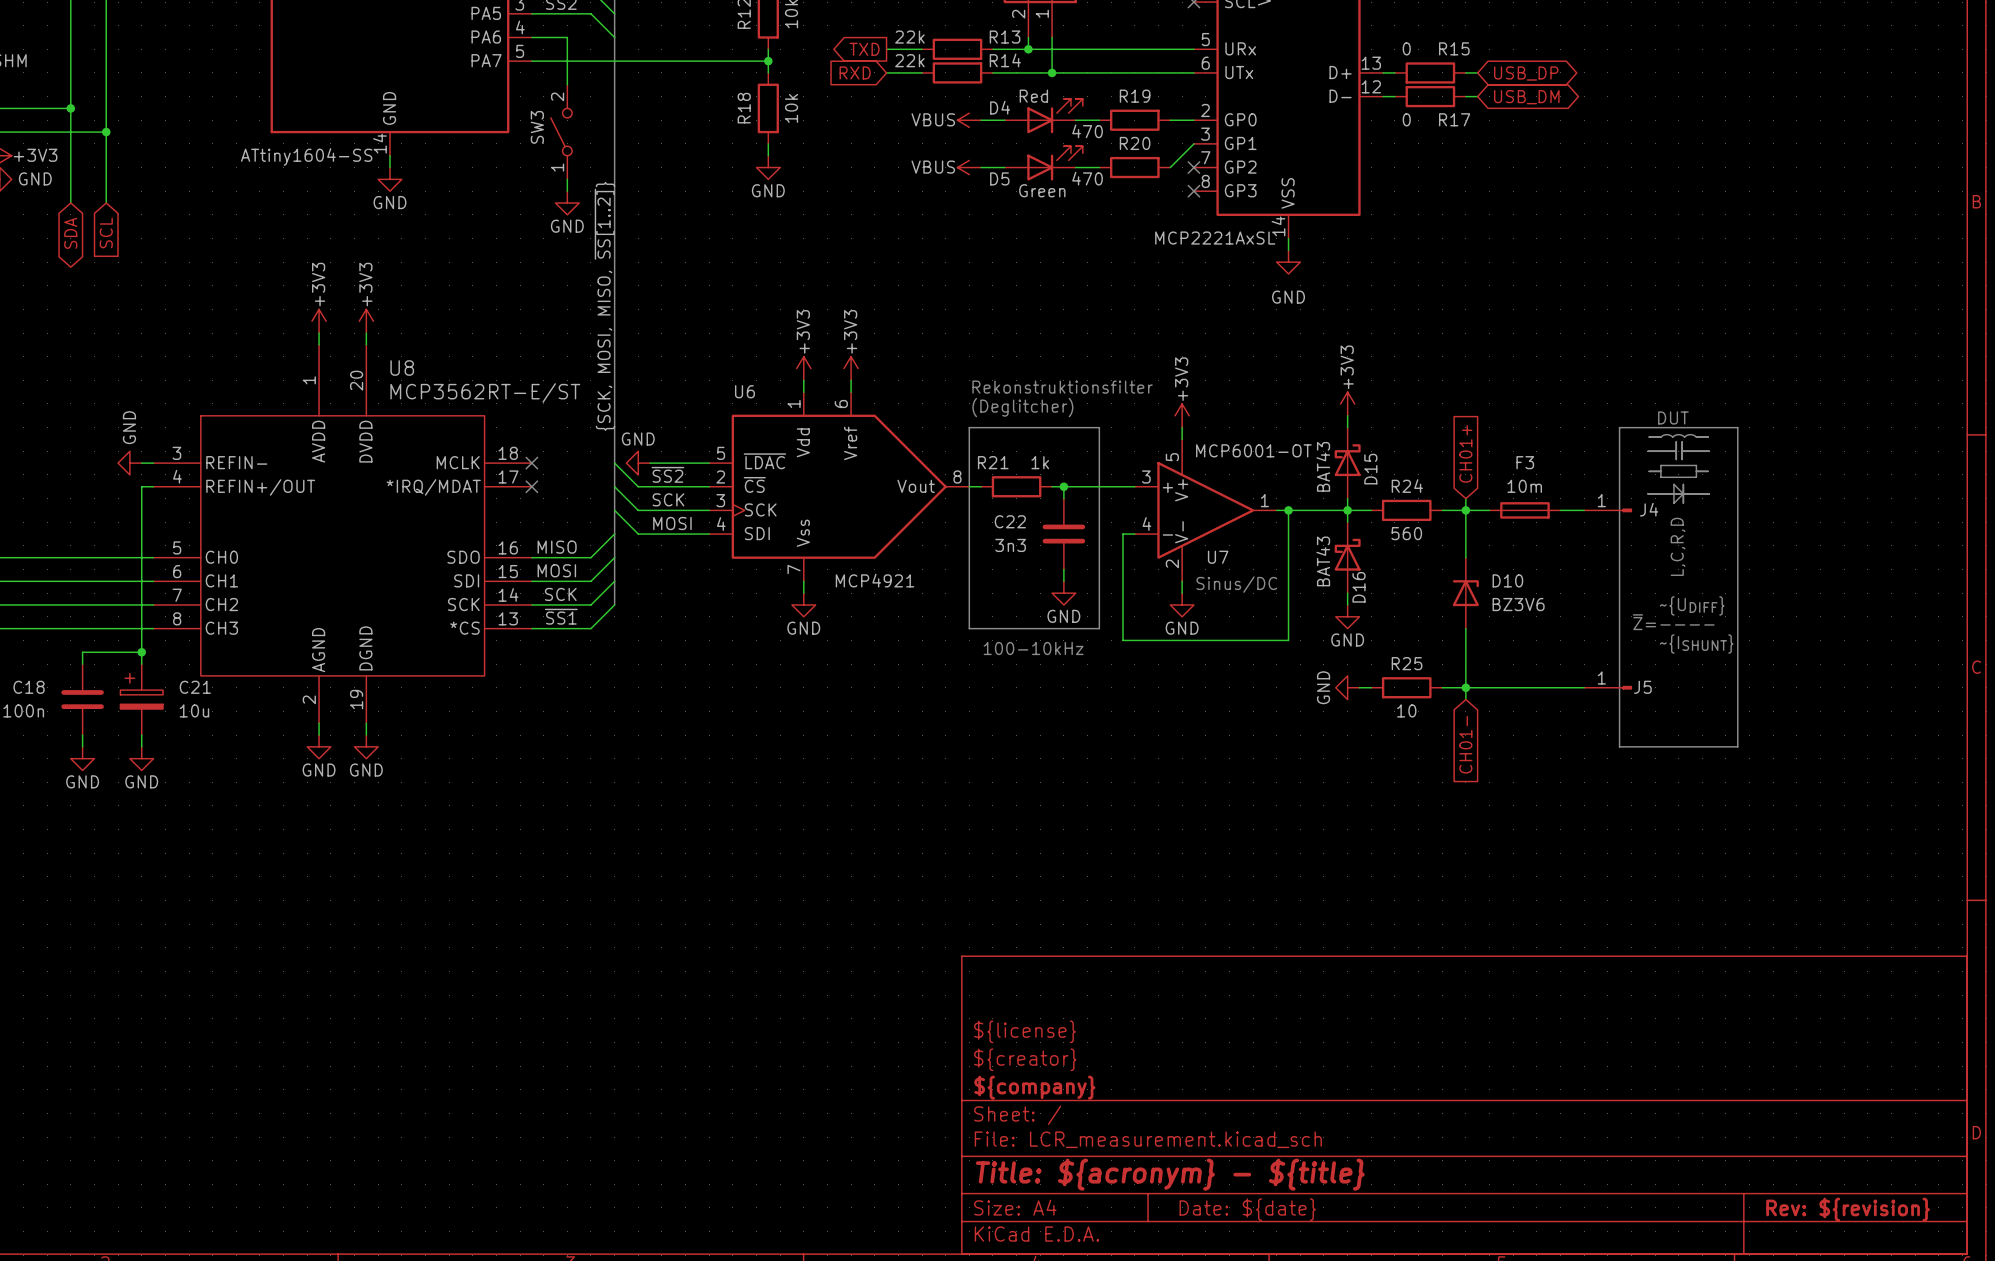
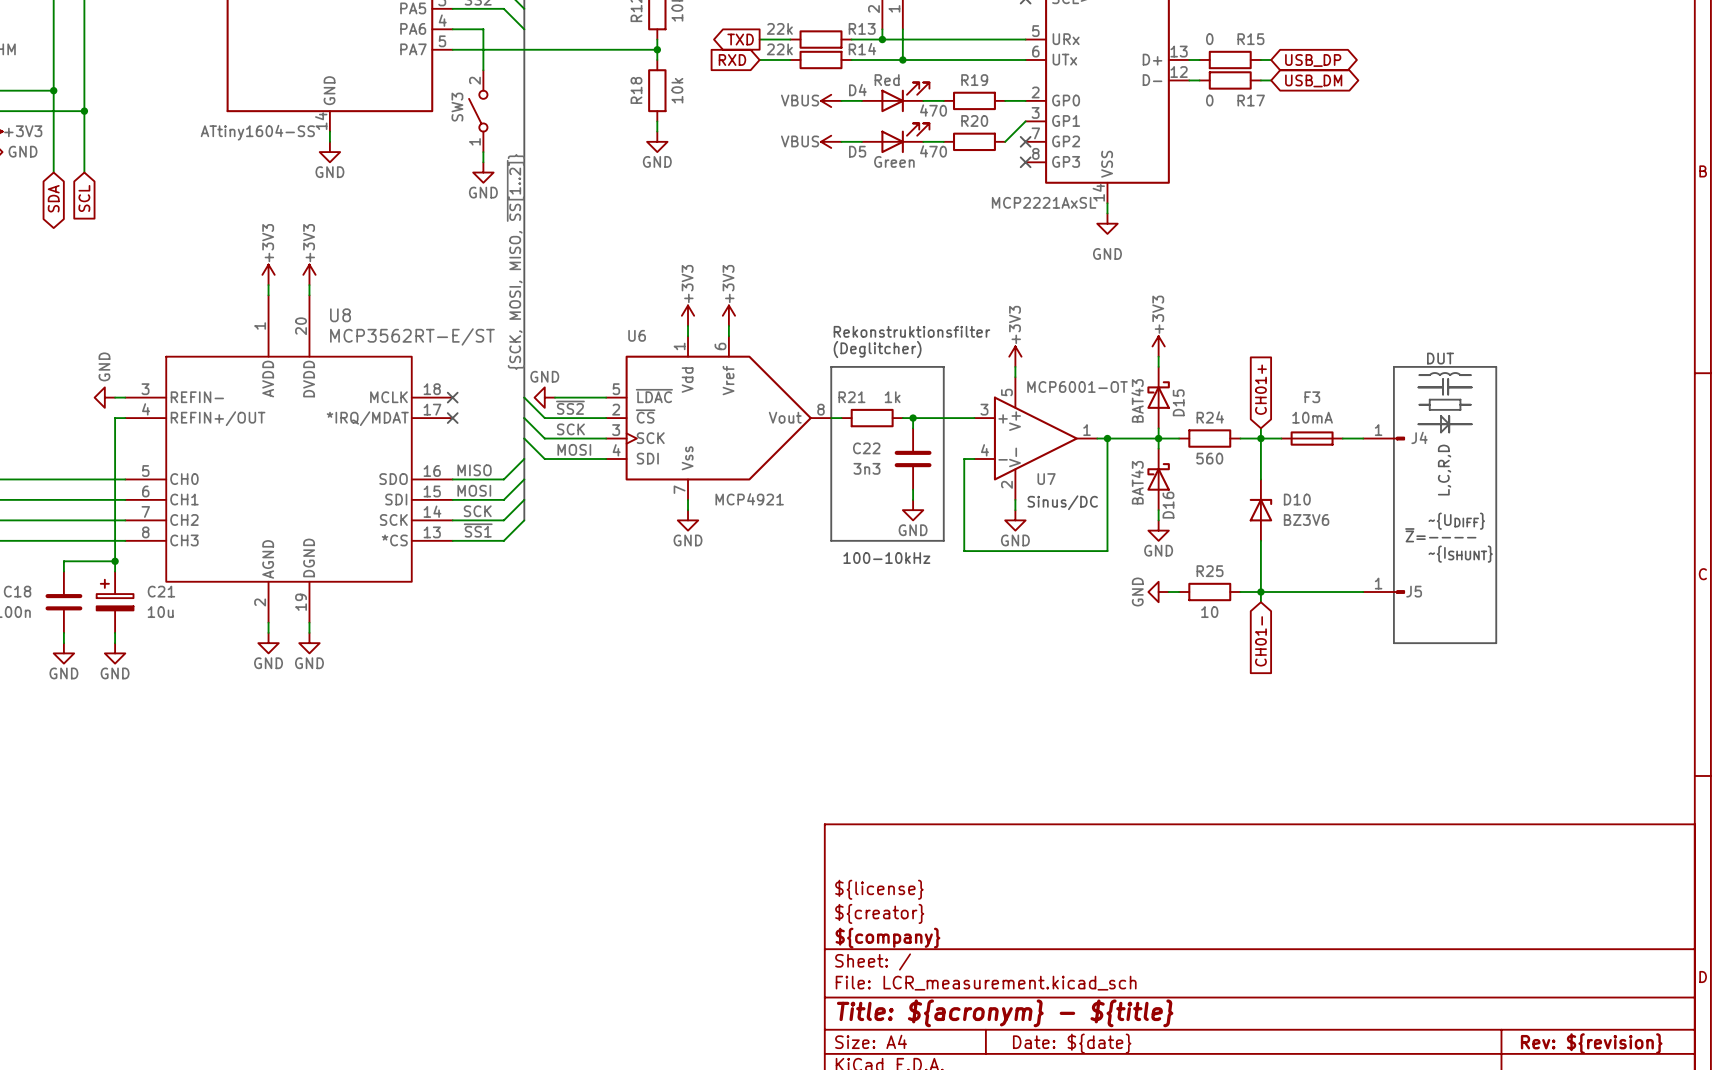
F3 value: 10m (1524, 486) -> 10mA (1312, 417)

